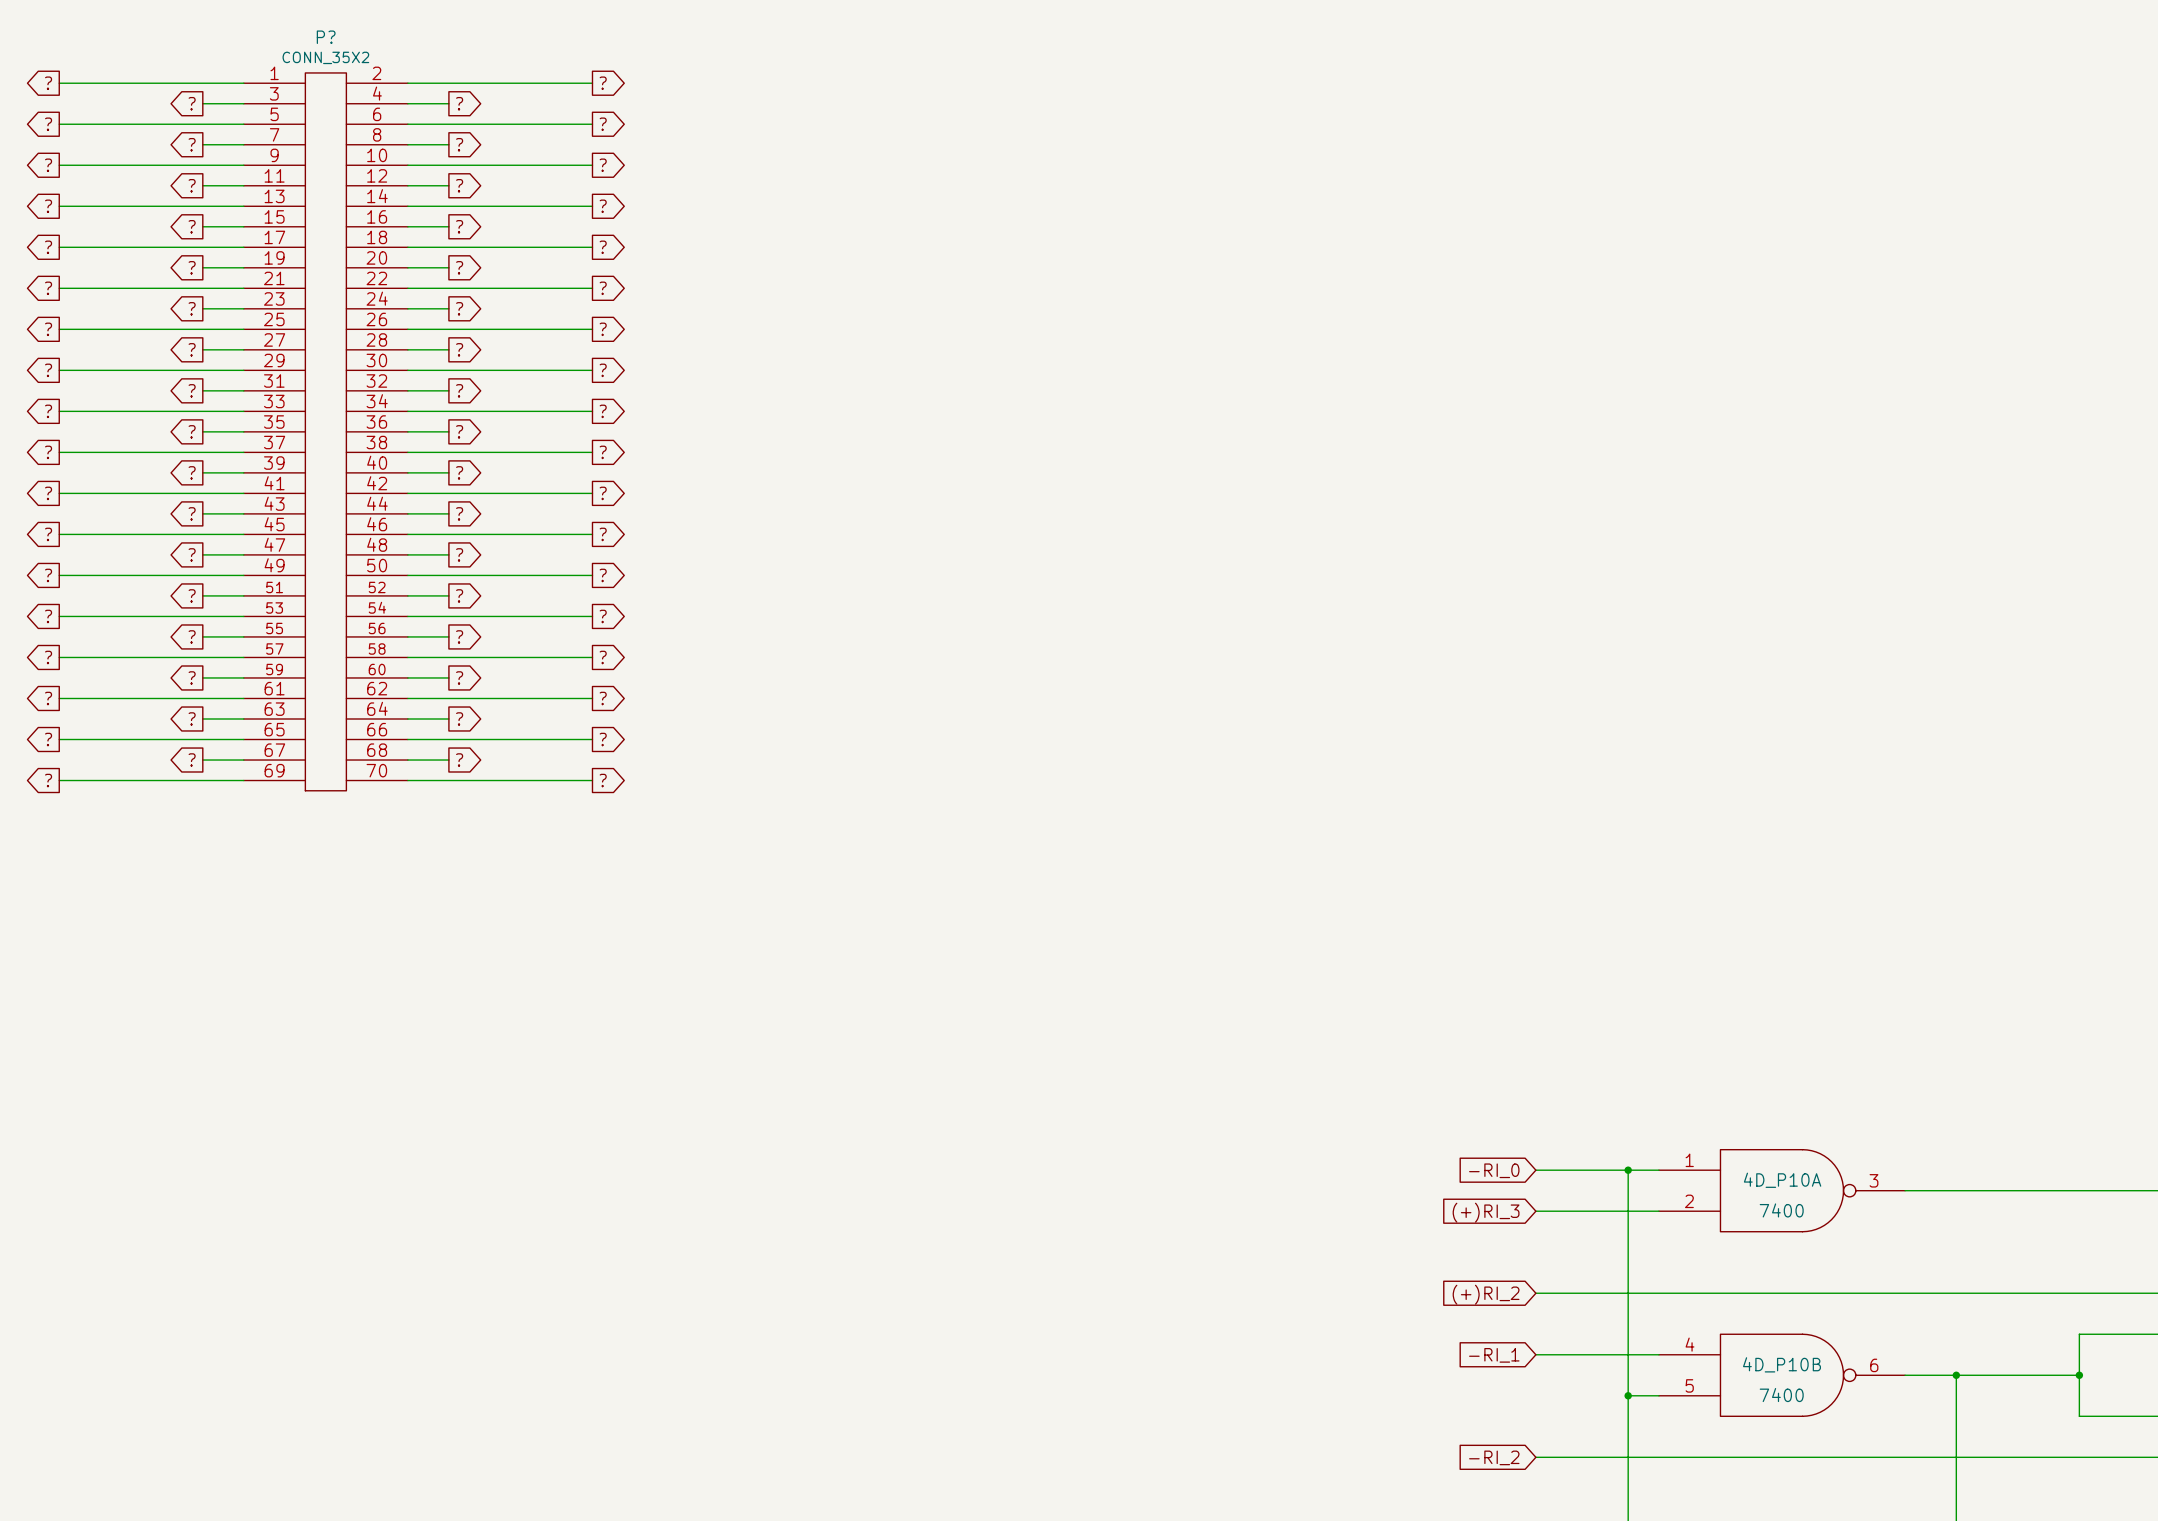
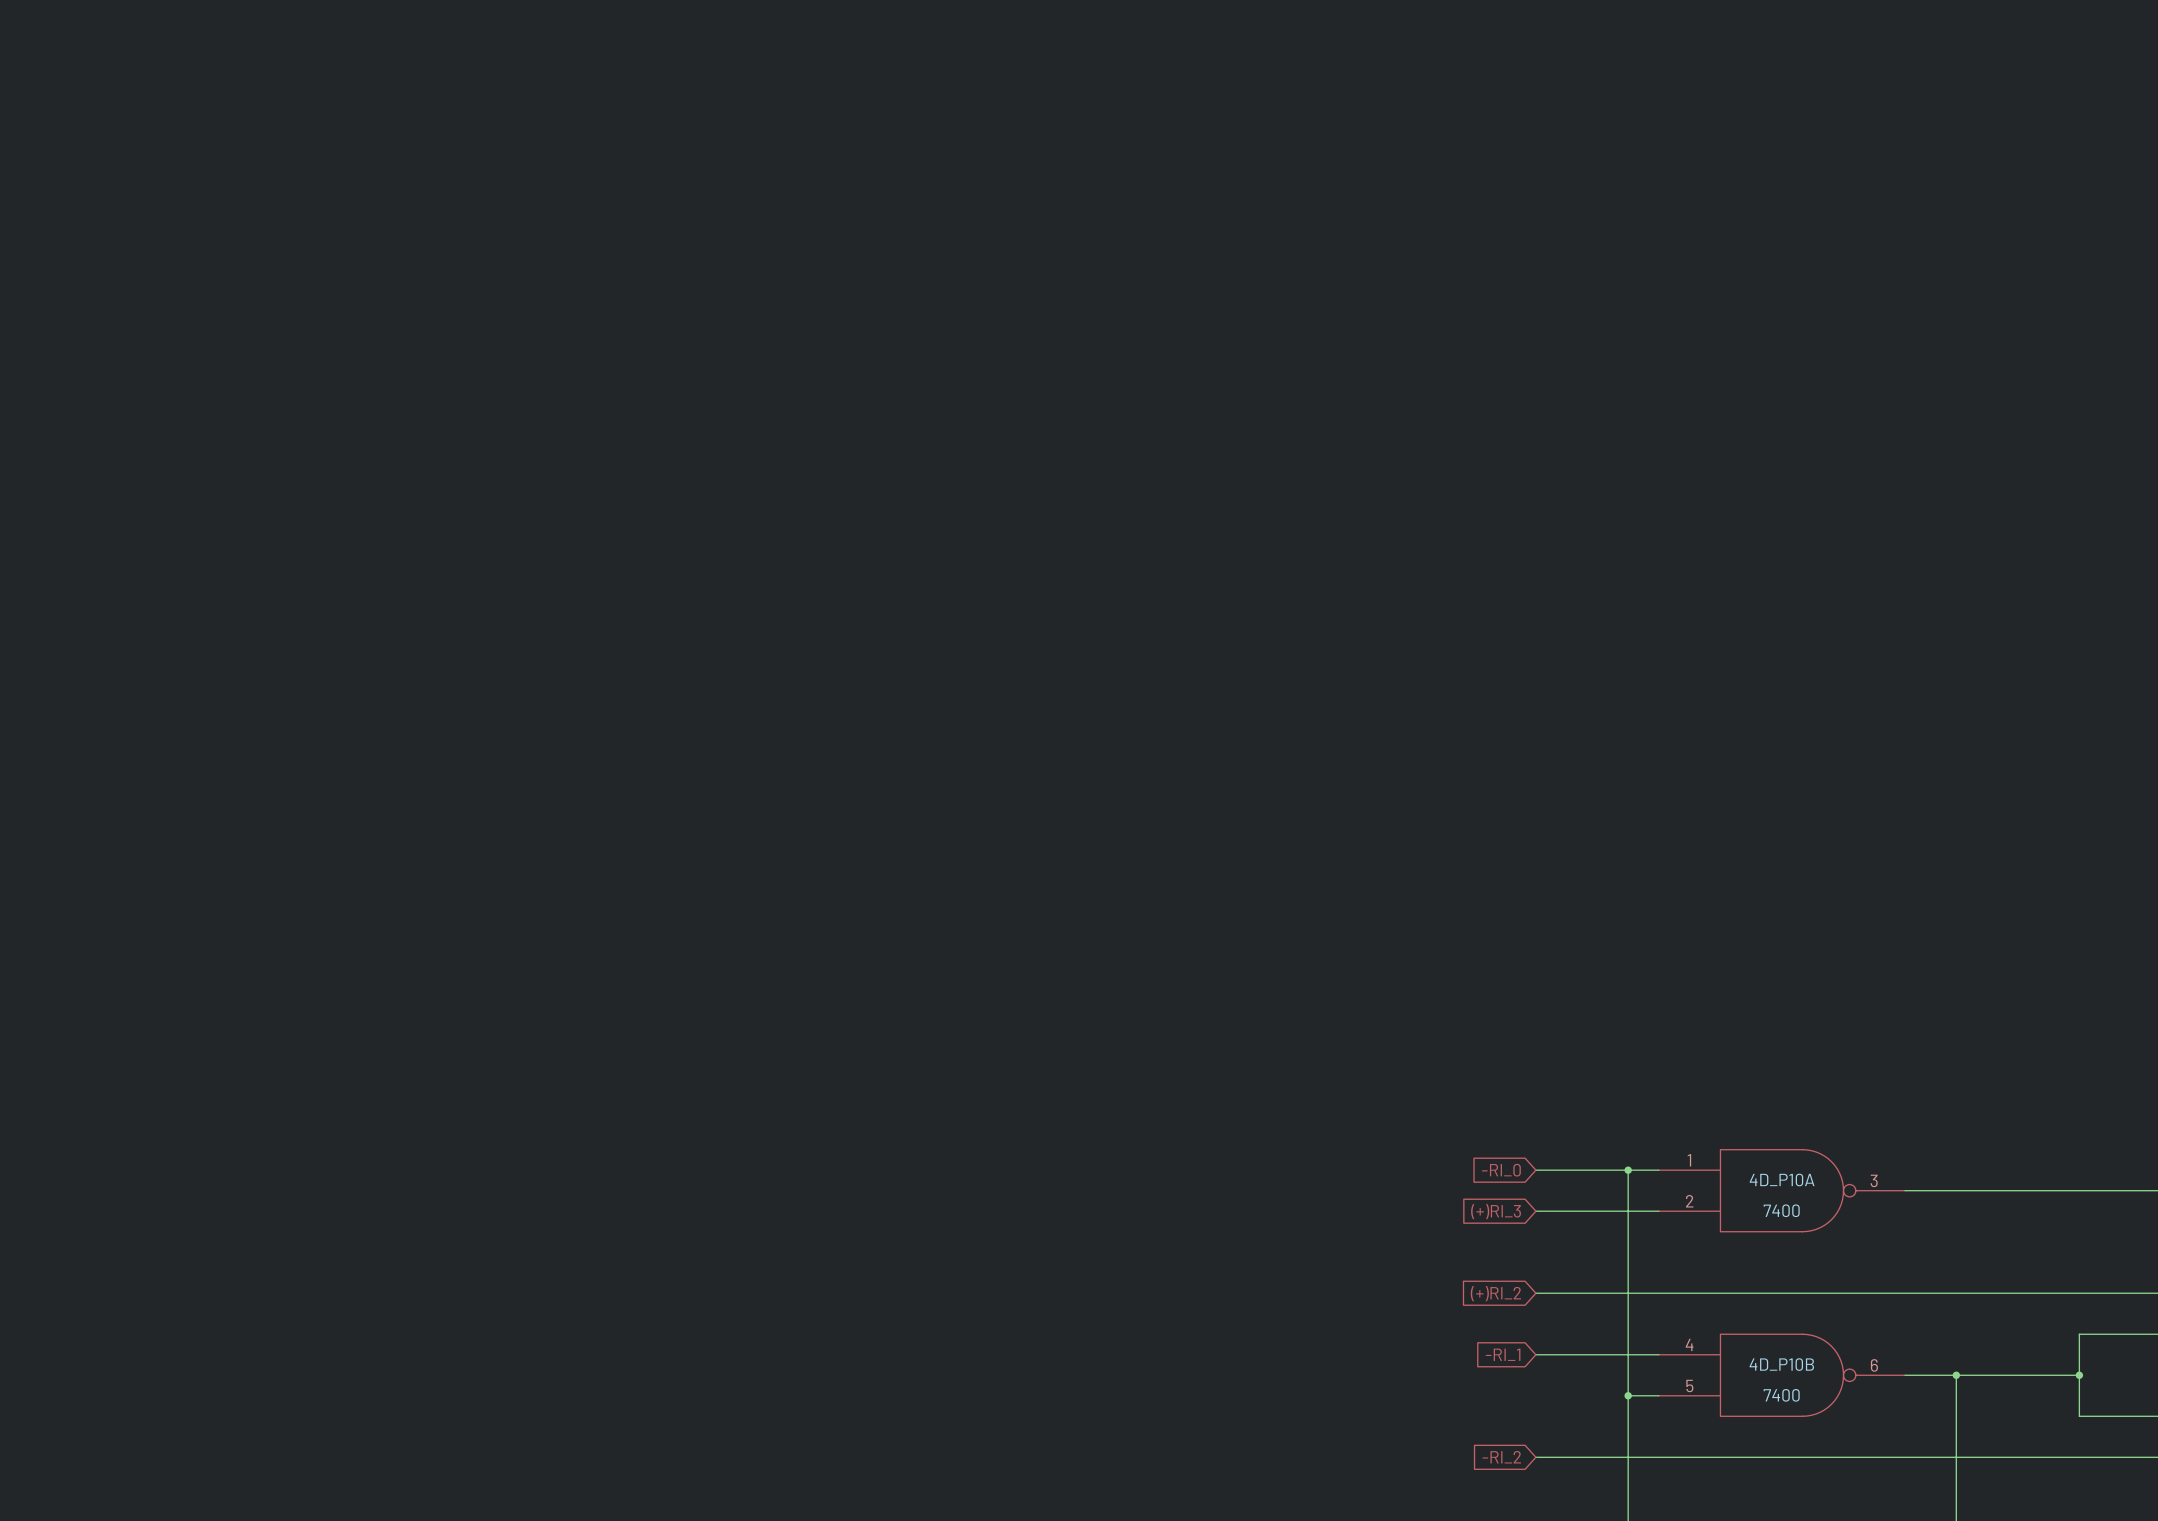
global label: ? (48, 83) -> none
wire: (59, 83) (243, 83) -> none
wire: (407, 83) (592, 83) -> none
global label: ? (603, 83) -> none
global label: ? (192, 103) -> none
wire: (202, 103) (243, 103) -> none
wire: (407, 103) (448, 103) -> none
global label: ? (459, 103) -> none
global label: ? (48, 124) -> none
wire: (59, 124) (243, 124) -> none
wire: (407, 124) (592, 124) -> none
global label: ? (603, 124) -> none
global label: ? (192, 144) -> none
wire: (202, 144) (243, 144) -> none
wire: (407, 144) (448, 144) -> none
global label: ? (459, 144) -> none
global label: ? (48, 165) -> none
wire: (59, 165) (243, 165) -> none
wire: (407, 165) (592, 165) -> none
global label: ? (603, 165) -> none
global label: ? (192, 185) -> none
wire: (202, 185) (243, 185) -> none
wire: (407, 185) (448, 185) -> none
global label: ? (459, 185) -> none
global label: ? (48, 206) -> none
wire: (59, 206) (243, 206) -> none
wire: (407, 206) (592, 206) -> none
global label: ? (603, 206) -> none
global label: ? (192, 226) -> none
wire: (202, 226) (243, 226) -> none
wire: (407, 226) (448, 226) -> none
global label: ? (459, 226) -> none
global label: ? (48, 247) -> none
wire: (59, 247) (243, 247) -> none
wire: (407, 247) (592, 247) -> none
global label: ? (603, 247) -> none
global label: ? (192, 267) -> none
wire: (202, 267) (243, 267) -> none
wire: (407, 267) (448, 267) -> none
global label: ? (459, 267) -> none
global label: ? (48, 288) -> none
wire: (59, 288) (243, 288) -> none
wire: (407, 288) (592, 288) -> none
global label: ? (603, 288) -> none
global label: ? (192, 308) -> none
wire: (202, 308) (243, 308) -> none
wire: (407, 308) (448, 308) -> none
global label: ? (459, 308) -> none
global label: ? (48, 329) -> none
wire: (59, 329) (243, 329) -> none
wire: (407, 329) (592, 329) -> none
global label: ? (603, 329) -> none
global label: ? (192, 349) -> none
wire: (202, 349) (243, 349) -> none
wire: (407, 349) (448, 349) -> none
global label: ? (459, 349) -> none
global label: ? (48, 370) -> none
wire: (59, 370) (243, 370) -> none
wire: (407, 370) (592, 370) -> none
global label: ? (603, 370) -> none
global label: ? (192, 390) -> none
wire: (202, 390) (243, 390) -> none
wire: (407, 390) (448, 390) -> none
global label: ? (459, 390) -> none
global label: ? (48, 411) -> none
wire: (59, 411) (243, 411) -> none
wire: (407, 411) (592, 411) -> none
global label: ? (603, 411) -> none
global label: ? (192, 431) -> none
wire: (202, 431) (243, 431) -> none
P?: CONN_35X2 (325, 431) -> none
wire: (407, 431) (448, 431) -> none
global label: ? (459, 431) -> none
global label: ? (48, 452) -> none
wire: (59, 452) (243, 452) -> none
wire: (407, 452) (592, 452) -> none
global label: ? (603, 452) -> none
global label: ? (192, 472) -> none
wire: (202, 472) (243, 472) -> none
wire: (407, 472) (448, 472) -> none
global label: ? (459, 472) -> none
global label: ? (48, 493) -> none
wire: (59, 493) (243, 493) -> none
wire: (407, 493) (592, 493) -> none
global label: ? (603, 493) -> none
global label: ? (192, 513) -> none
wire: (202, 513) (243, 513) -> none
wire: (407, 513) (448, 513) -> none
global label: ? (459, 513) -> none
global label: ? (48, 534) -> none
wire: (59, 534) (243, 534) -> none
wire: (407, 534) (592, 534) -> none
global label: ? (603, 534) -> none
global label: ? (192, 554) -> none
wire: (202, 554) (243, 554) -> none
wire: (407, 554) (448, 554) -> none
global label: ? (459, 554) -> none
global label: ? (48, 575) -> none
wire: (59, 575) (243, 575) -> none
wire: (407, 575) (592, 575) -> none
global label: ? (603, 575) -> none
global label: ? (192, 595) -> none
wire: (202, 595) (243, 595) -> none
wire: (407, 595) (448, 595) -> none
global label: ? (459, 595) -> none
global label: ? (48, 616) -> none
wire: (59, 616) (243, 616) -> none
wire: (407, 616) (592, 616) -> none
global label: ? (603, 616) -> none
global label: ? (192, 636) -> none
wire: (202, 636) (243, 636) -> none
wire: (407, 636) (448, 636) -> none
global label: ? (459, 636) -> none
global label: ? (48, 657) -> none
wire: (59, 657) (243, 657) -> none
wire: (407, 657) (592, 657) -> none
global label: ? (603, 657) -> none
global label: ? (192, 677) -> none
wire: (202, 677) (243, 677) -> none
wire: (407, 677) (448, 677) -> none
global label: ? (459, 677) -> none
global label: ? (48, 698) -> none
wire: (59, 698) (243, 698) -> none
wire: (407, 698) (592, 698) -> none
global label: ? (603, 698) -> none
global label: ? (192, 718) -> none
wire: (202, 718) (243, 718) -> none
wire: (407, 718) (448, 718) -> none
global label: ? (459, 718) -> none
global label: ? (48, 739) -> none
wire: (59, 739) (243, 739) -> none
wire: (407, 739) (592, 739) -> none
global label: ? (603, 739) -> none
global label: ? (192, 760) -> none
wire: (202, 760) (243, 760) -> none
wire: (407, 760) (448, 760) -> none
global label: ? (459, 760) -> none
global label: ? (48, 780) -> none
wire: (59, 780) (243, 780) -> none
wire: (407, 780) (592, 780) -> none
global label: ? (603, 780) -> none

